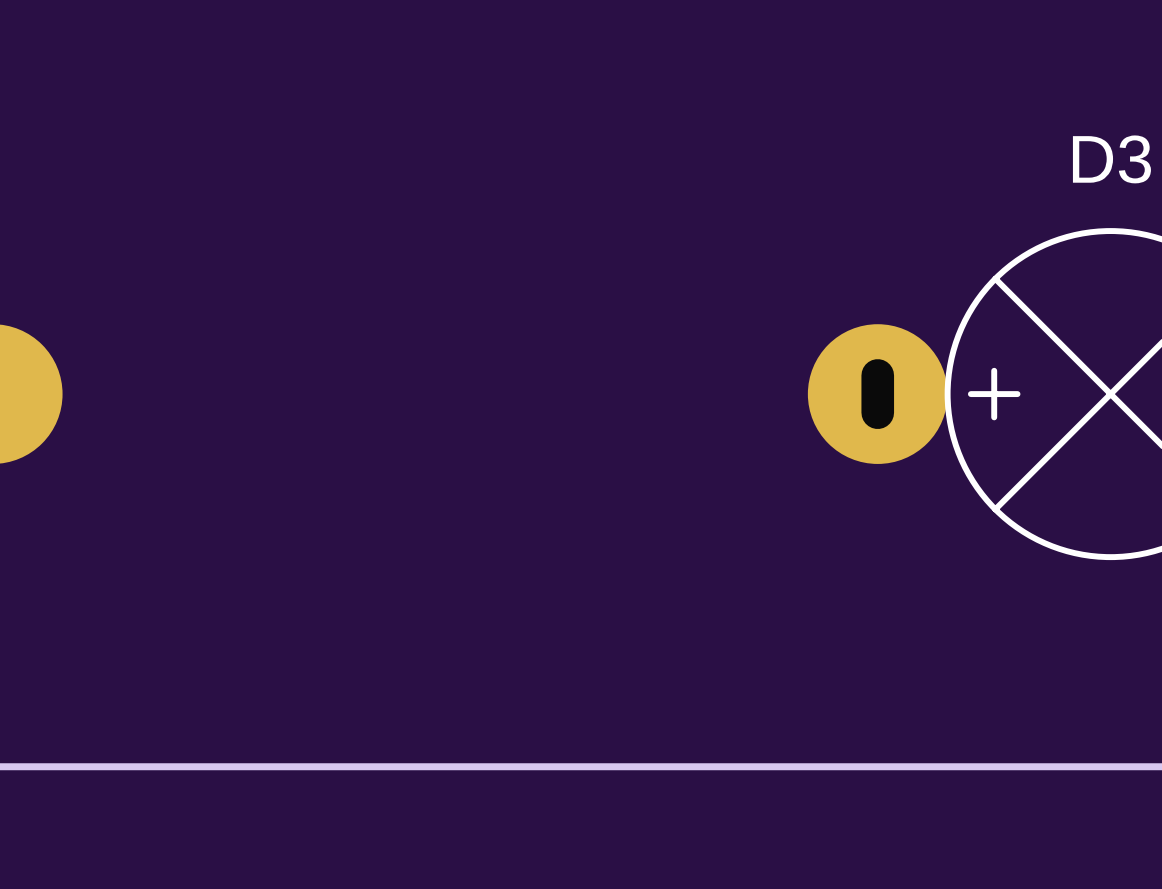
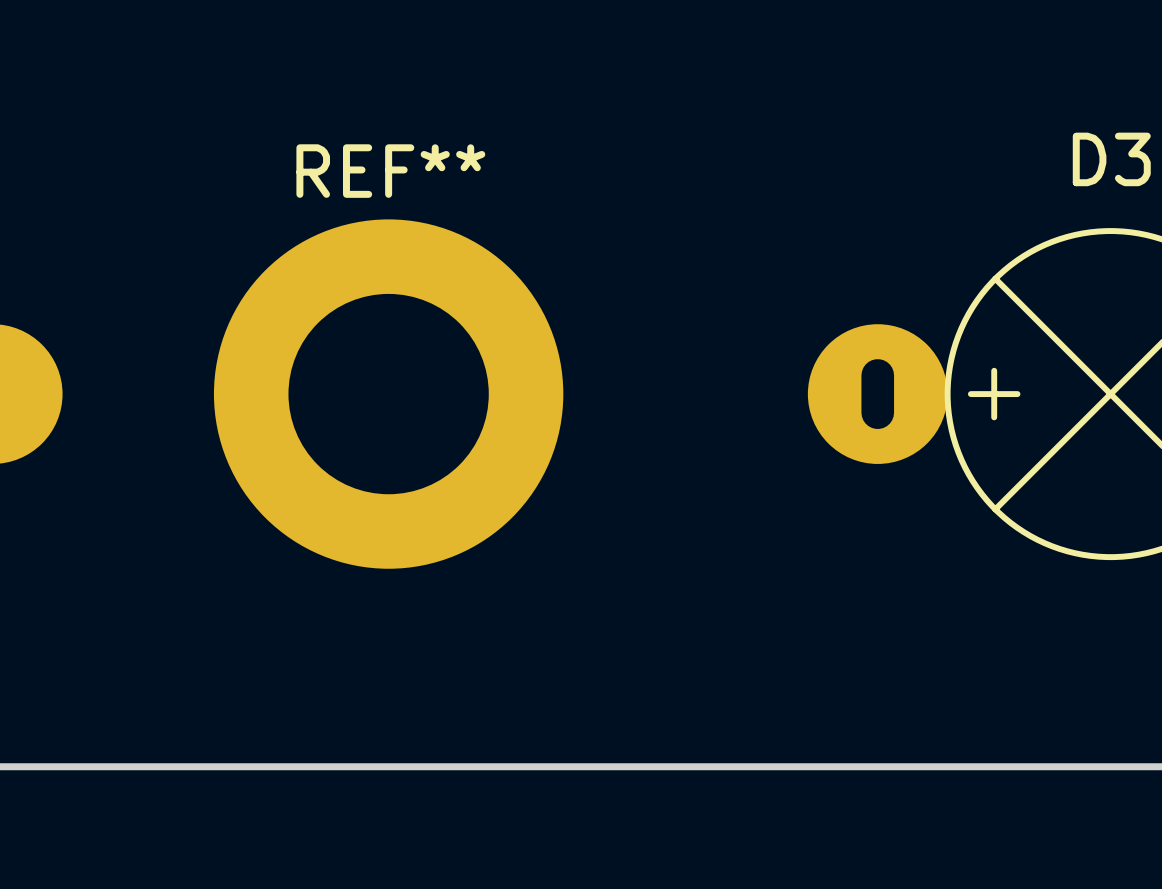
REF**: none -> (388, 394)

